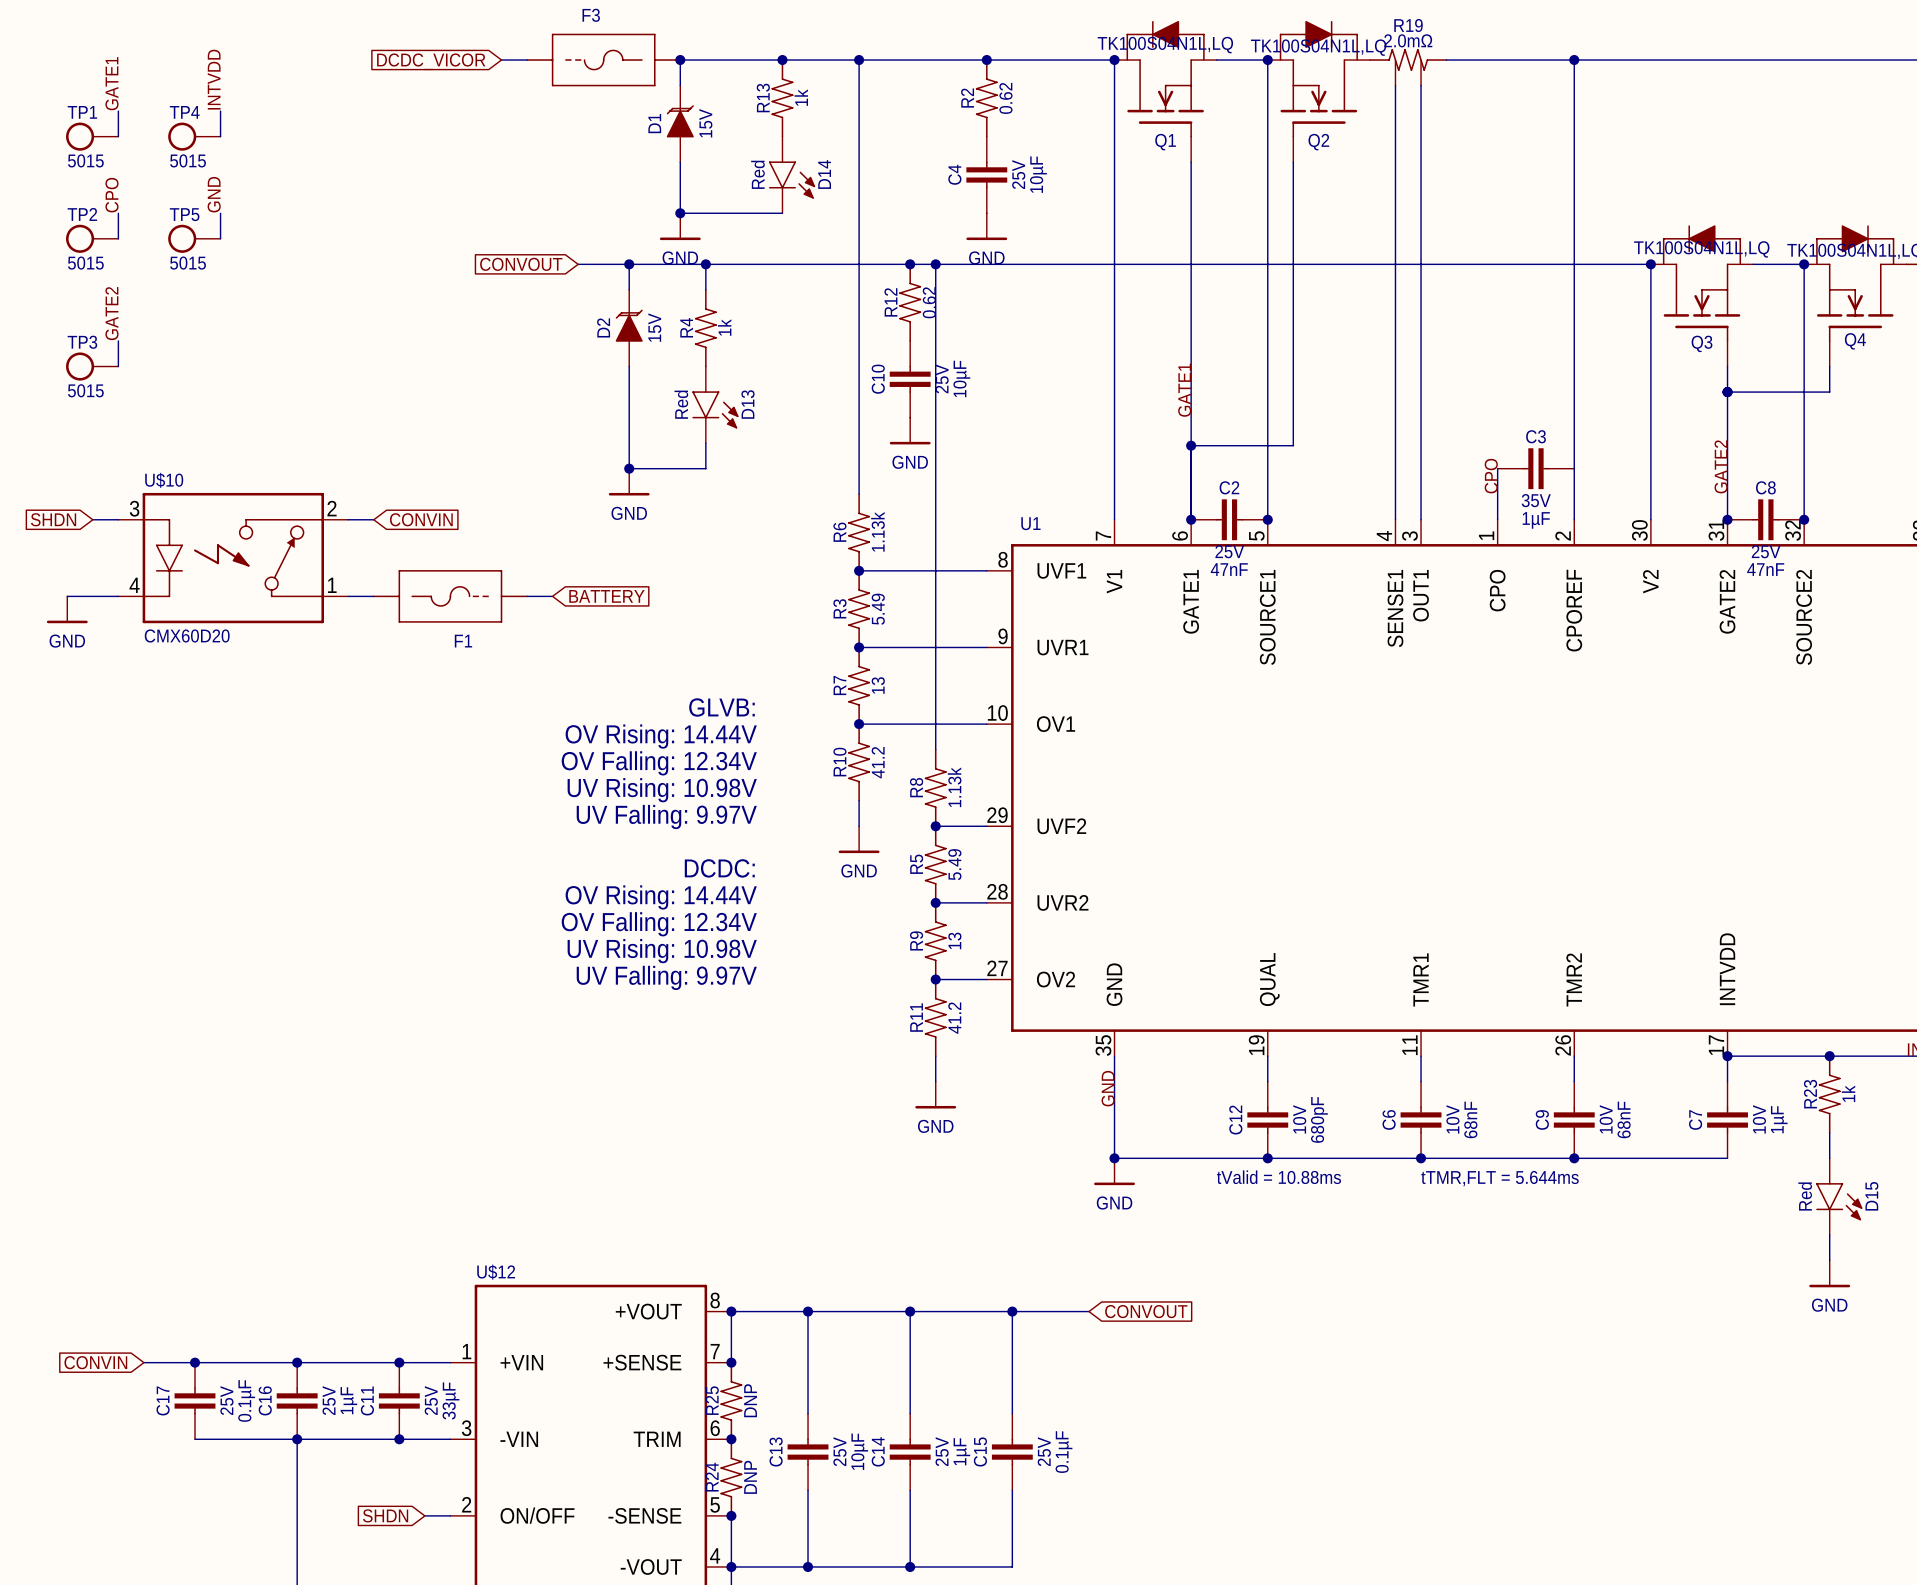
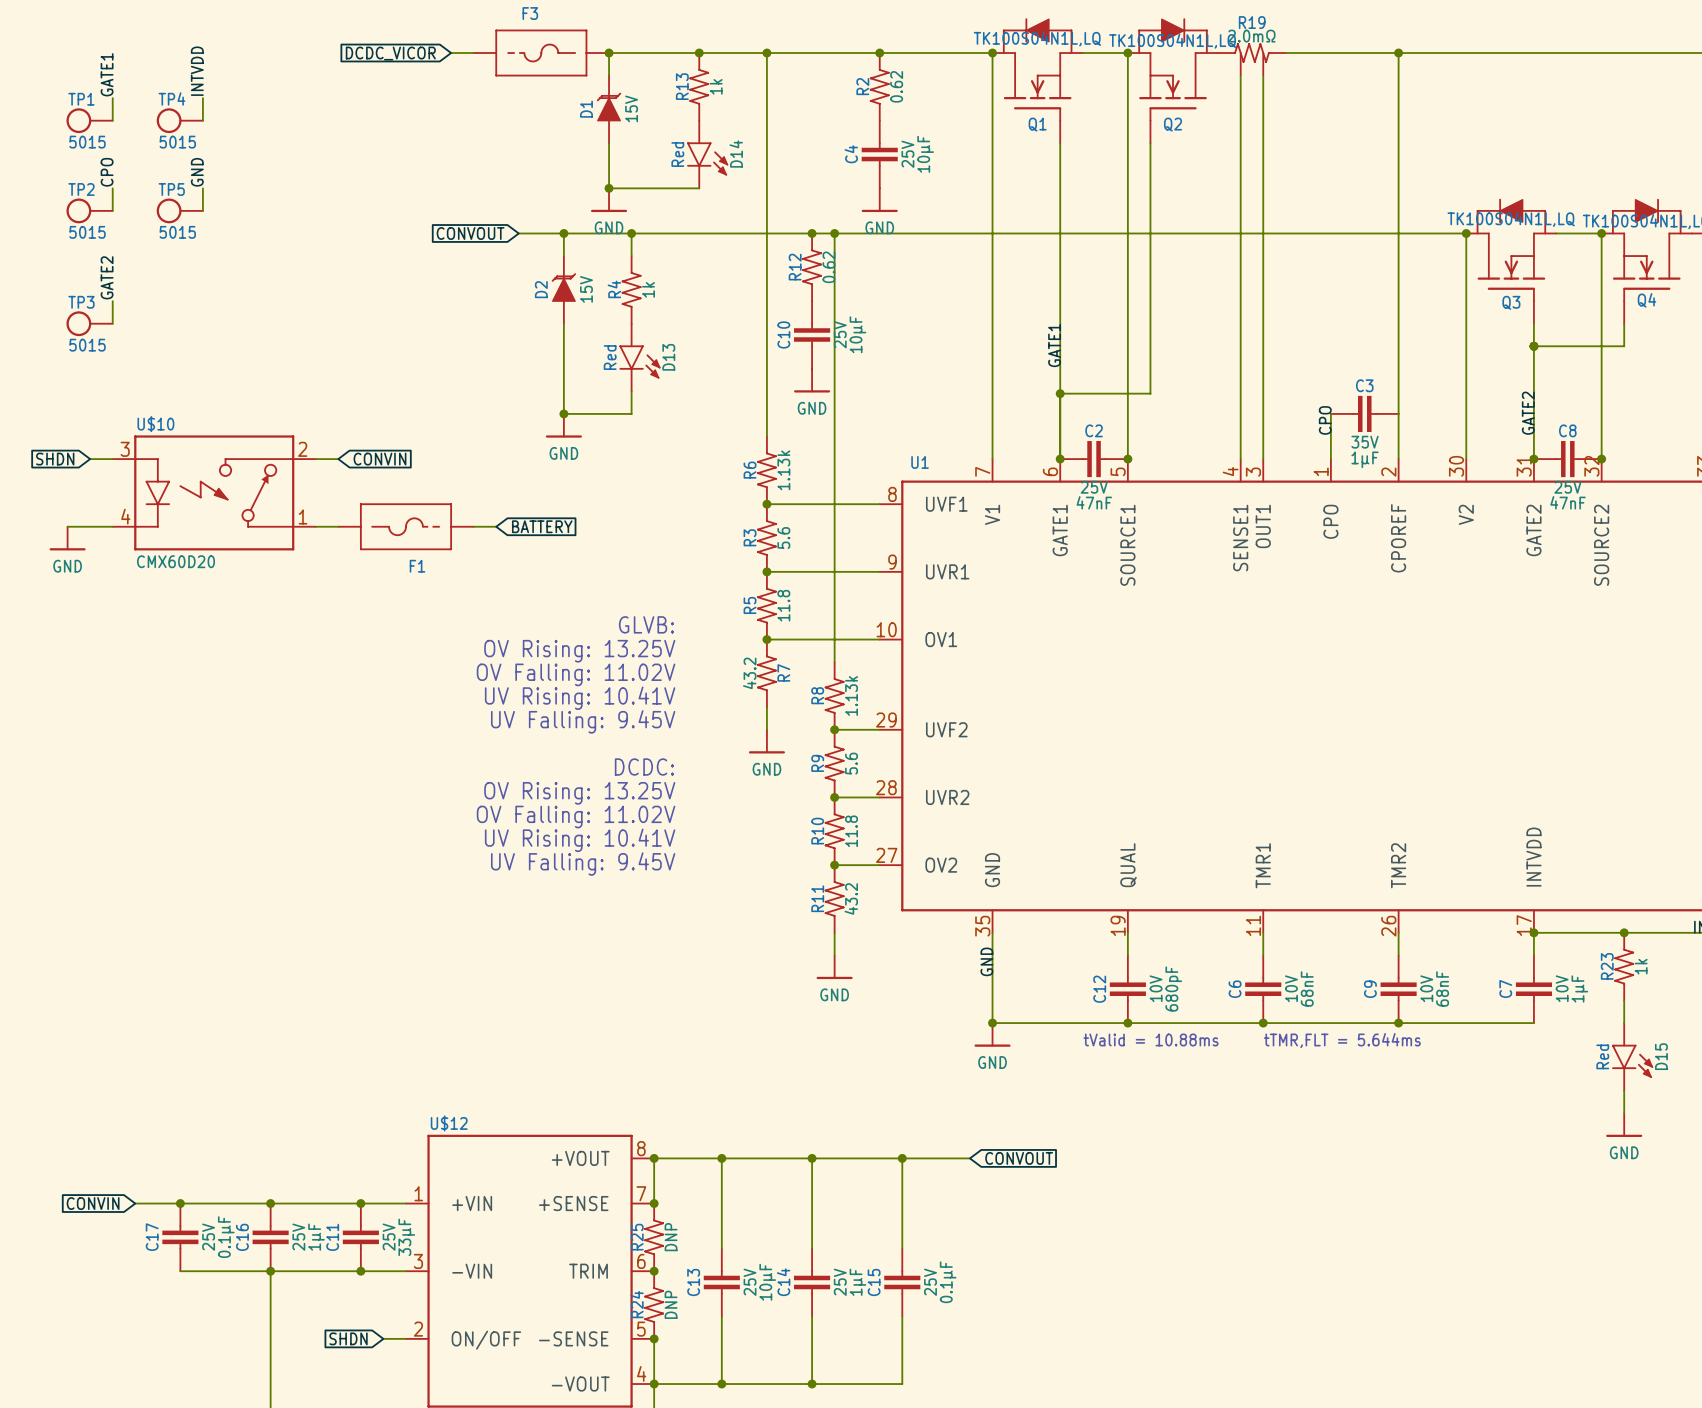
R3 text: 5.49 (878, 609) -> 5.6 (783, 538)
R7 name: R7 (839, 685) -> R5 (750, 605)
R7 text: 13 (878, 685) -> 11.8 (783, 605)
text: OV Rising: 14.44V (661, 736) -> OV Rising: 13.25V (579, 651)
R10 name: R10 (839, 762) -> R7 (783, 672)
R10 text: 41.2 (878, 762) -> 43.2 (749, 673)
text: OV Falling: 12.34V (659, 763) -> OV Falling: 11.02V (576, 674)
text: UV Rising: 10.98V (662, 790) -> UV Rising: 10.41V (580, 698)
text: UV Falling: 9.97V (666, 817) -> UV Falling: 9.45V (583, 721)
R5 name: R5 (916, 864) -> R9 (817, 763)
R5 text: 5.49 (954, 864) -> 5.6 (851, 763)
text: OV Rising: 14.44V (661, 897) -> OV Rising: 13.25V (579, 793)
text: OV Falling: 12.34V (659, 924) -> OV Falling: 11.02V (576, 817)
R9 name: R9 (916, 940) -> R10 (817, 831)
R9 text: 13 (954, 940) -> 11.8 (851, 831)
text: UV Rising: 10.98V (662, 951) -> UV Rising: 10.41V (580, 840)
text: UV Falling: 9.97V (666, 977) -> UV Falling: 9.45V (583, 864)
R11 text: 41.2 (954, 1018) -> 43.2 (851, 898)

